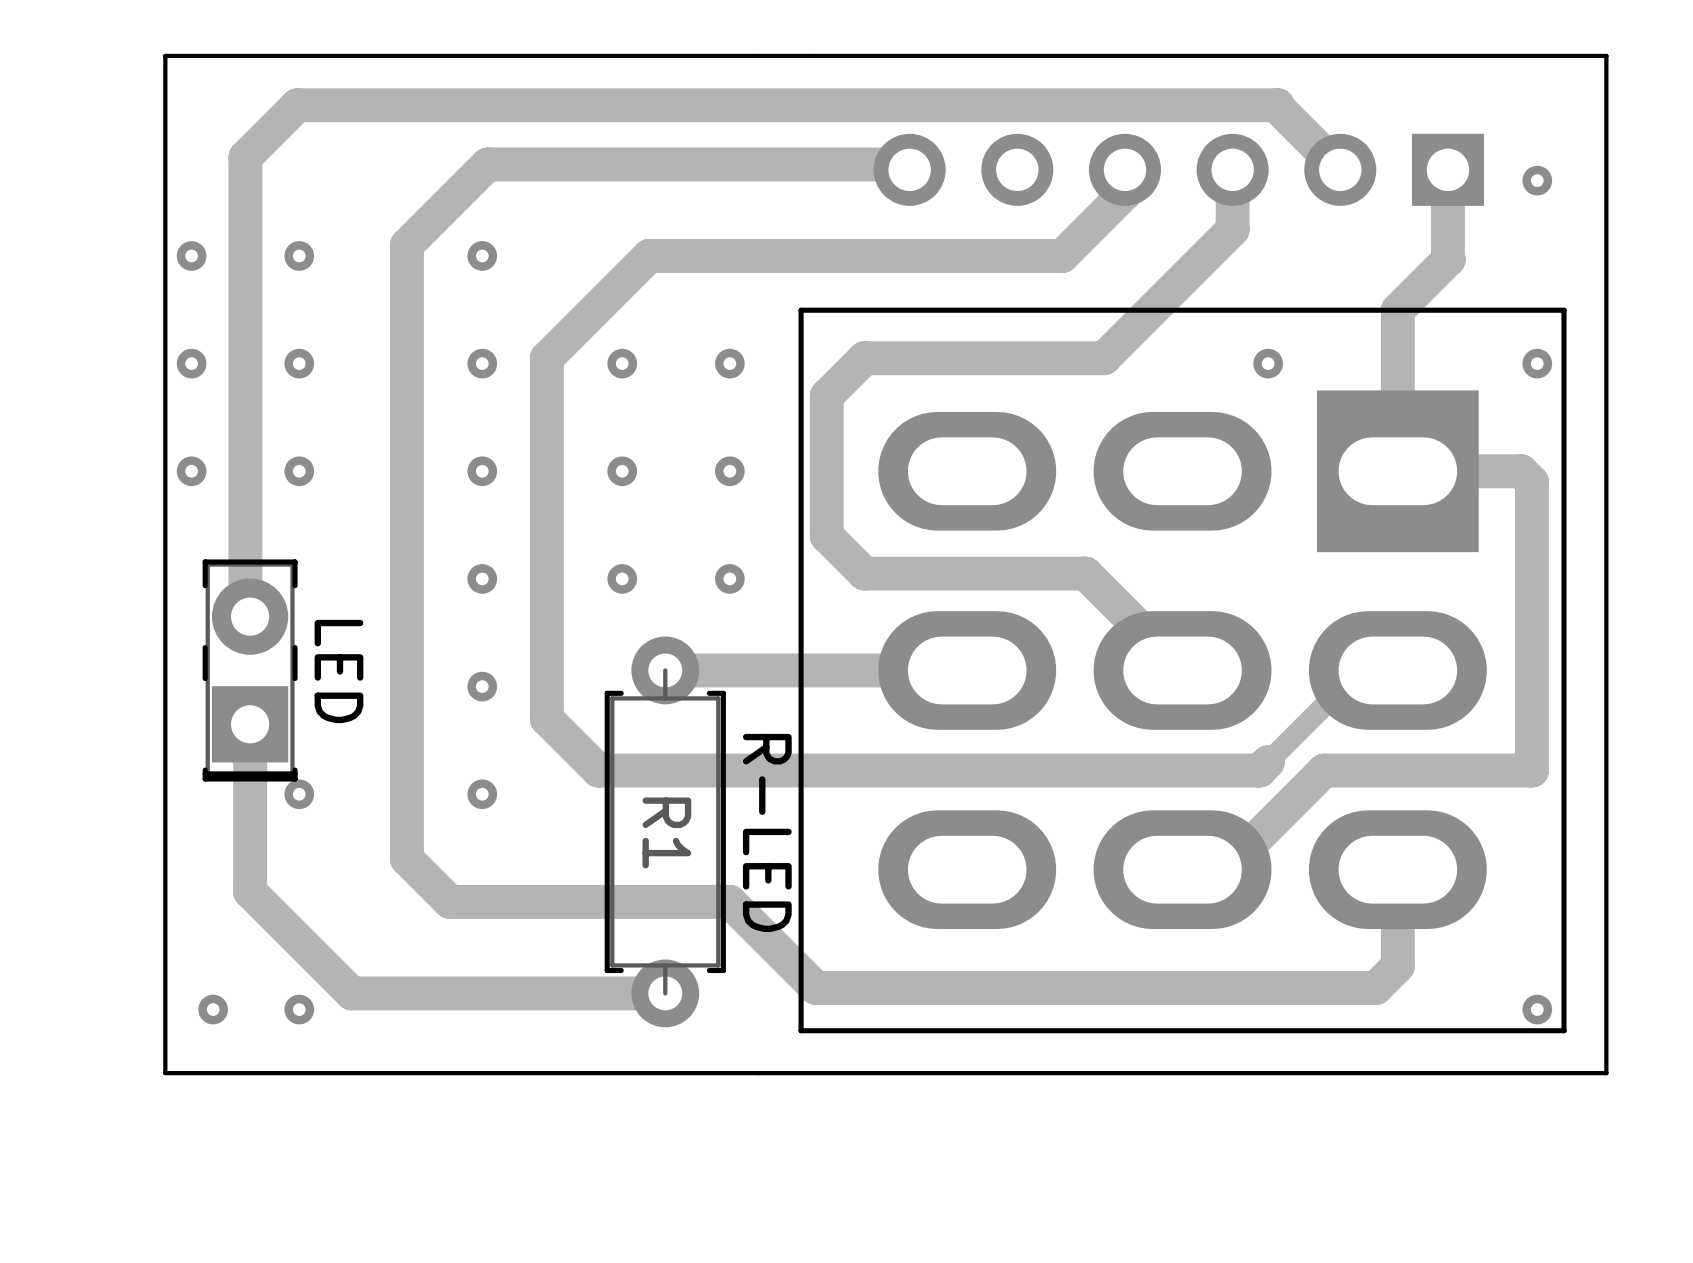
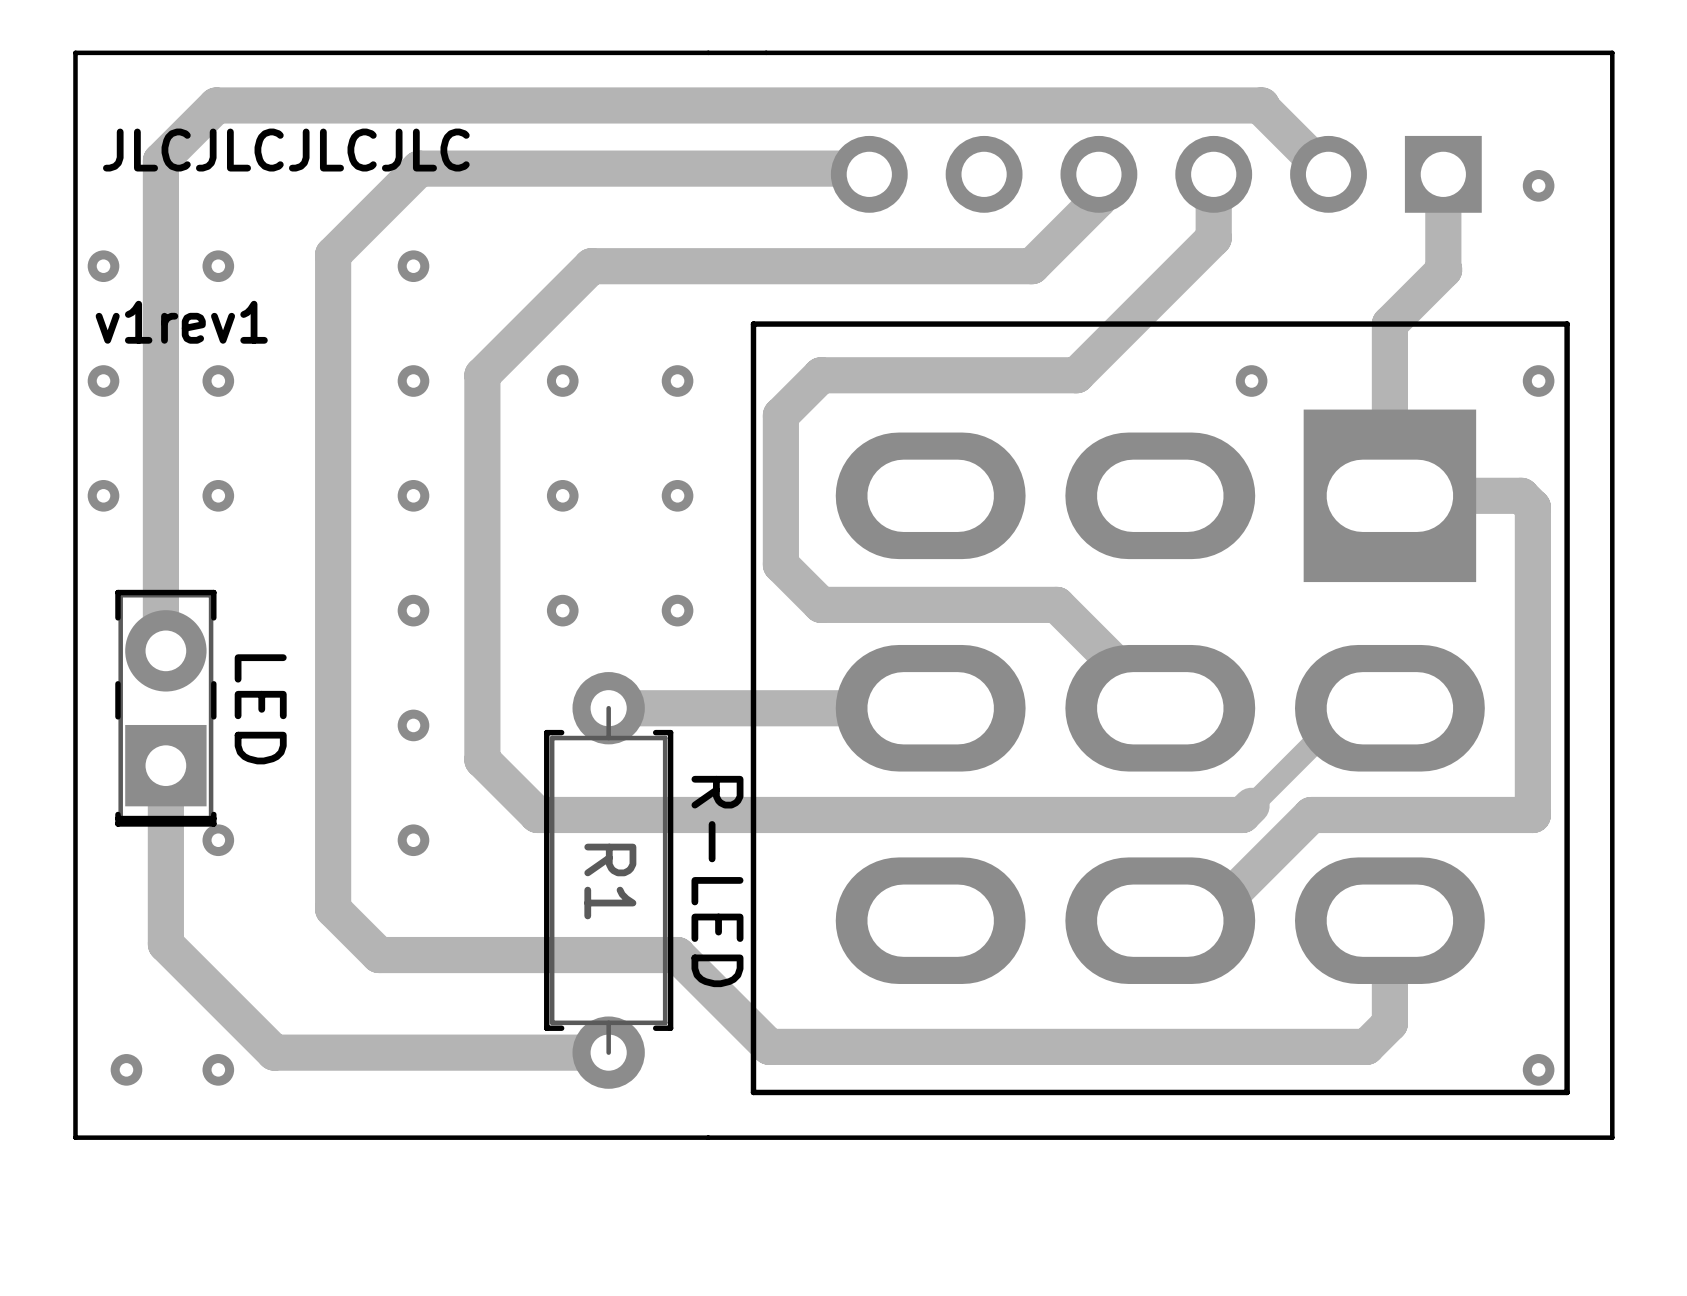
text: none -> JLCJLCJLCJLC (286, 150)
text: none -> v1rev1 (181, 322)

